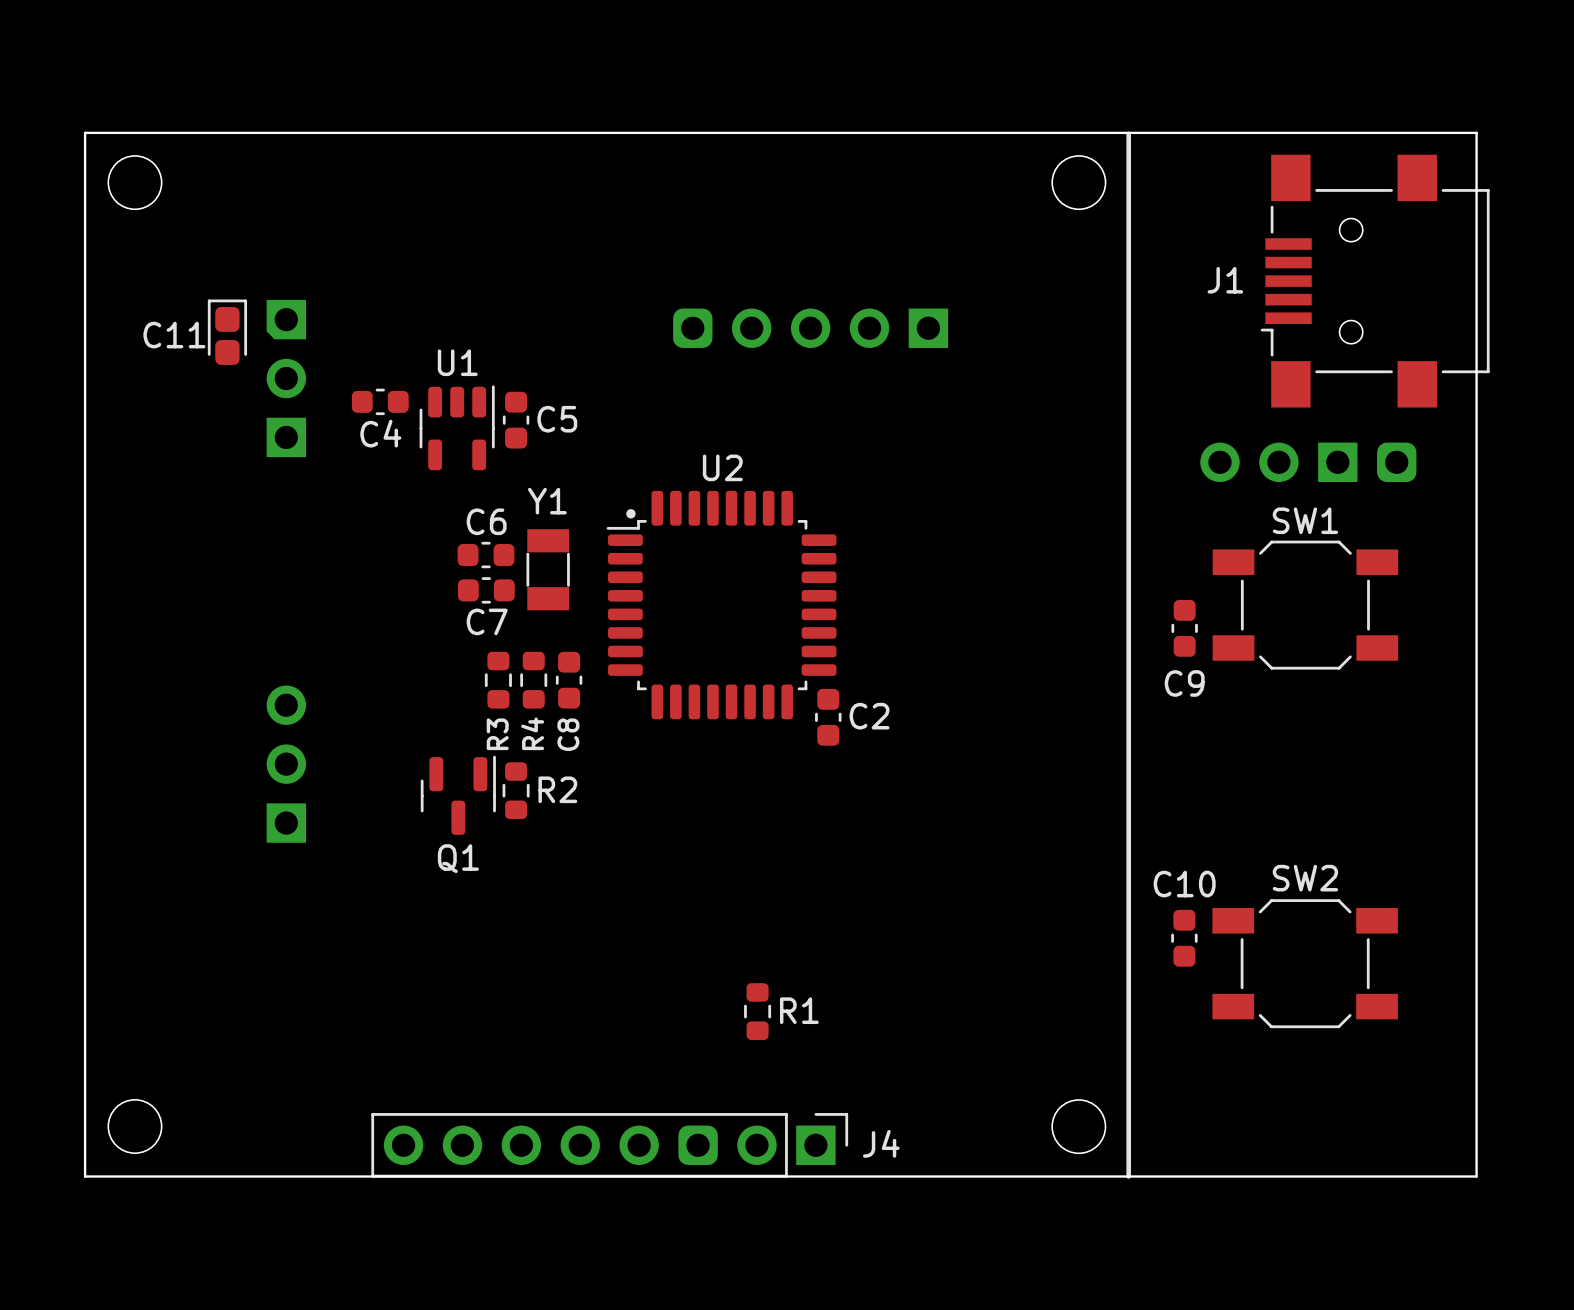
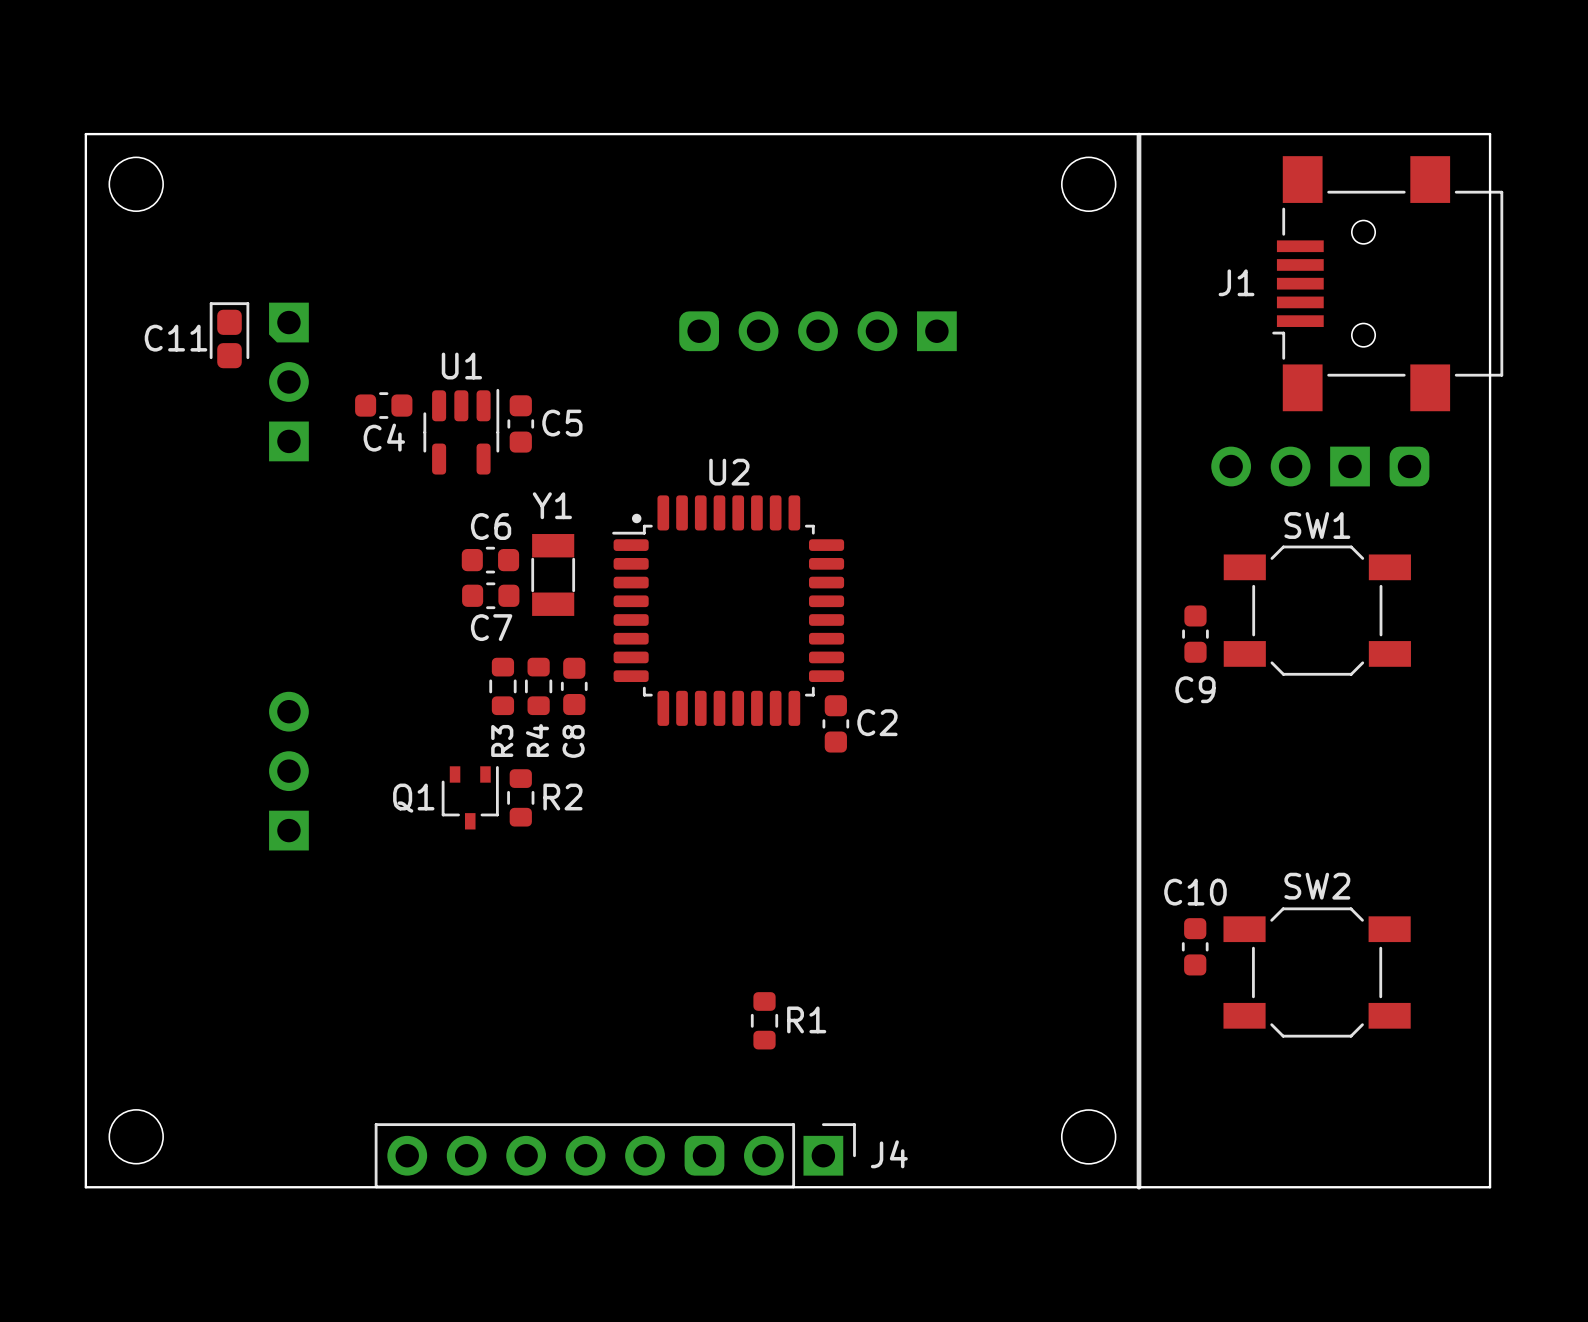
Q1 footprint: [420, 755, 496, 835] -> [441, 766, 499, 830]
Q1 name position: Q1 (458, 858) -> Q1 (413, 798)

